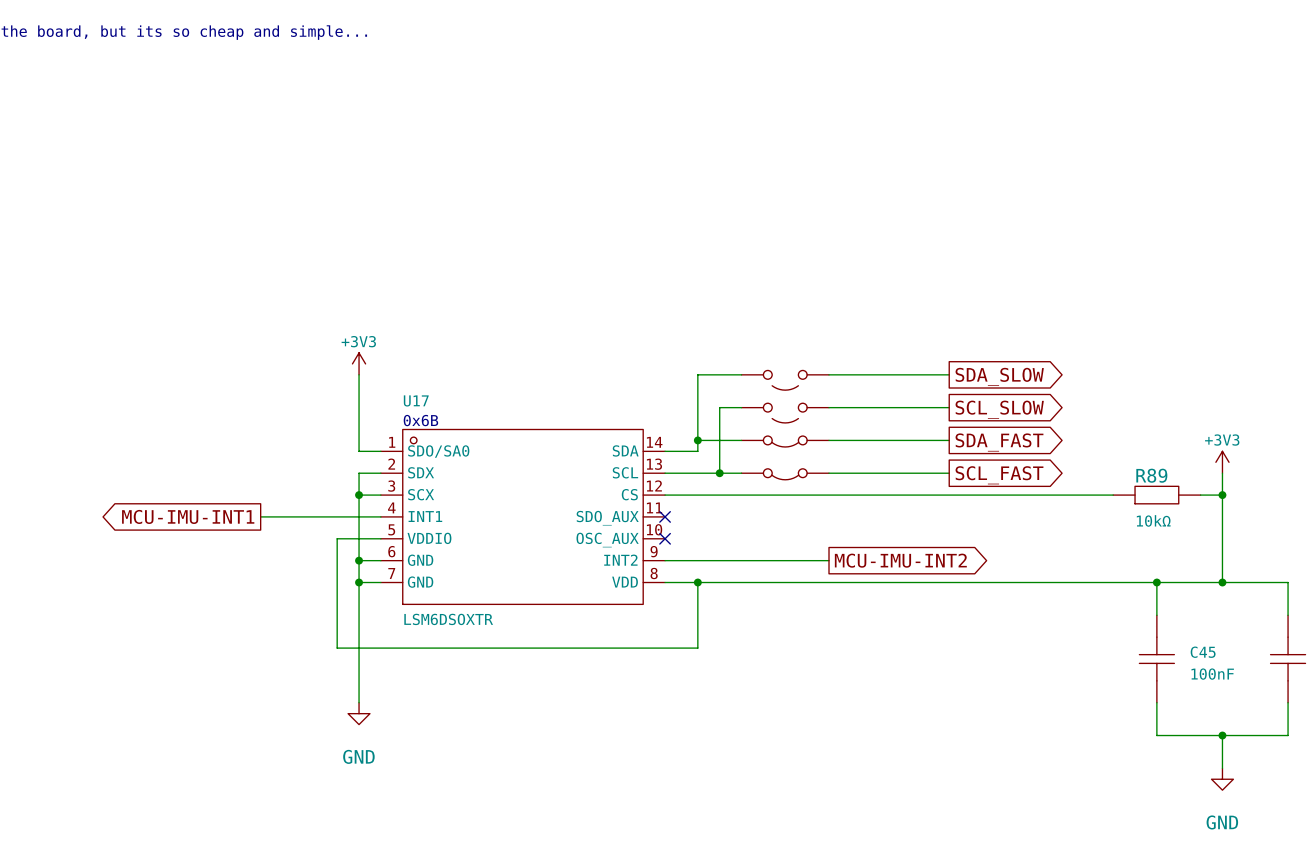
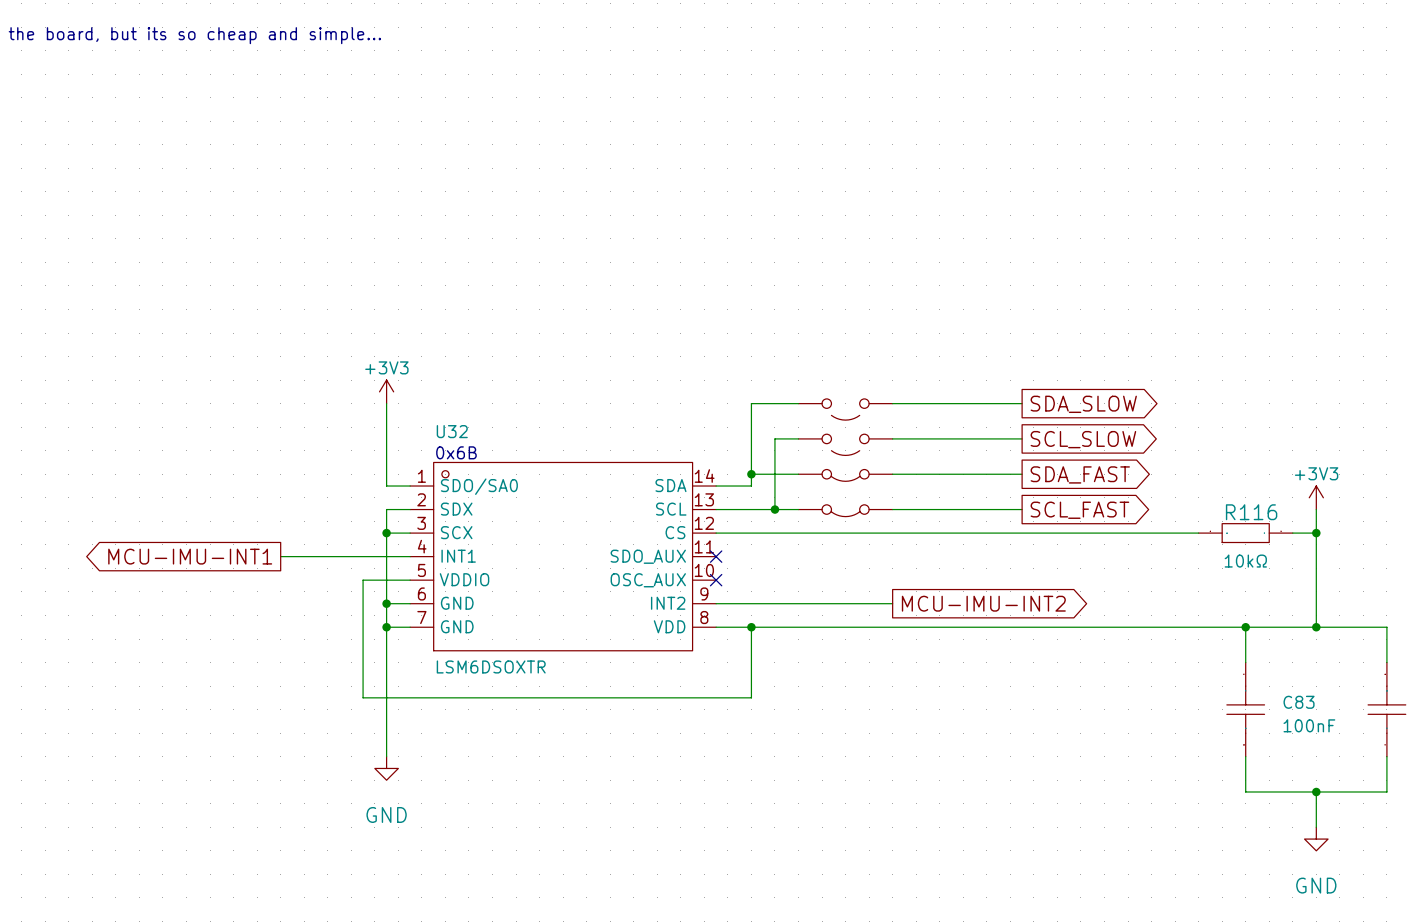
U17 name: U17 (416, 400) -> U32 (452, 431)
R89 name: R89 (1151, 475) -> R116 (1251, 512)
C45 name: C45 (1203, 652) -> C83 (1299, 702)

